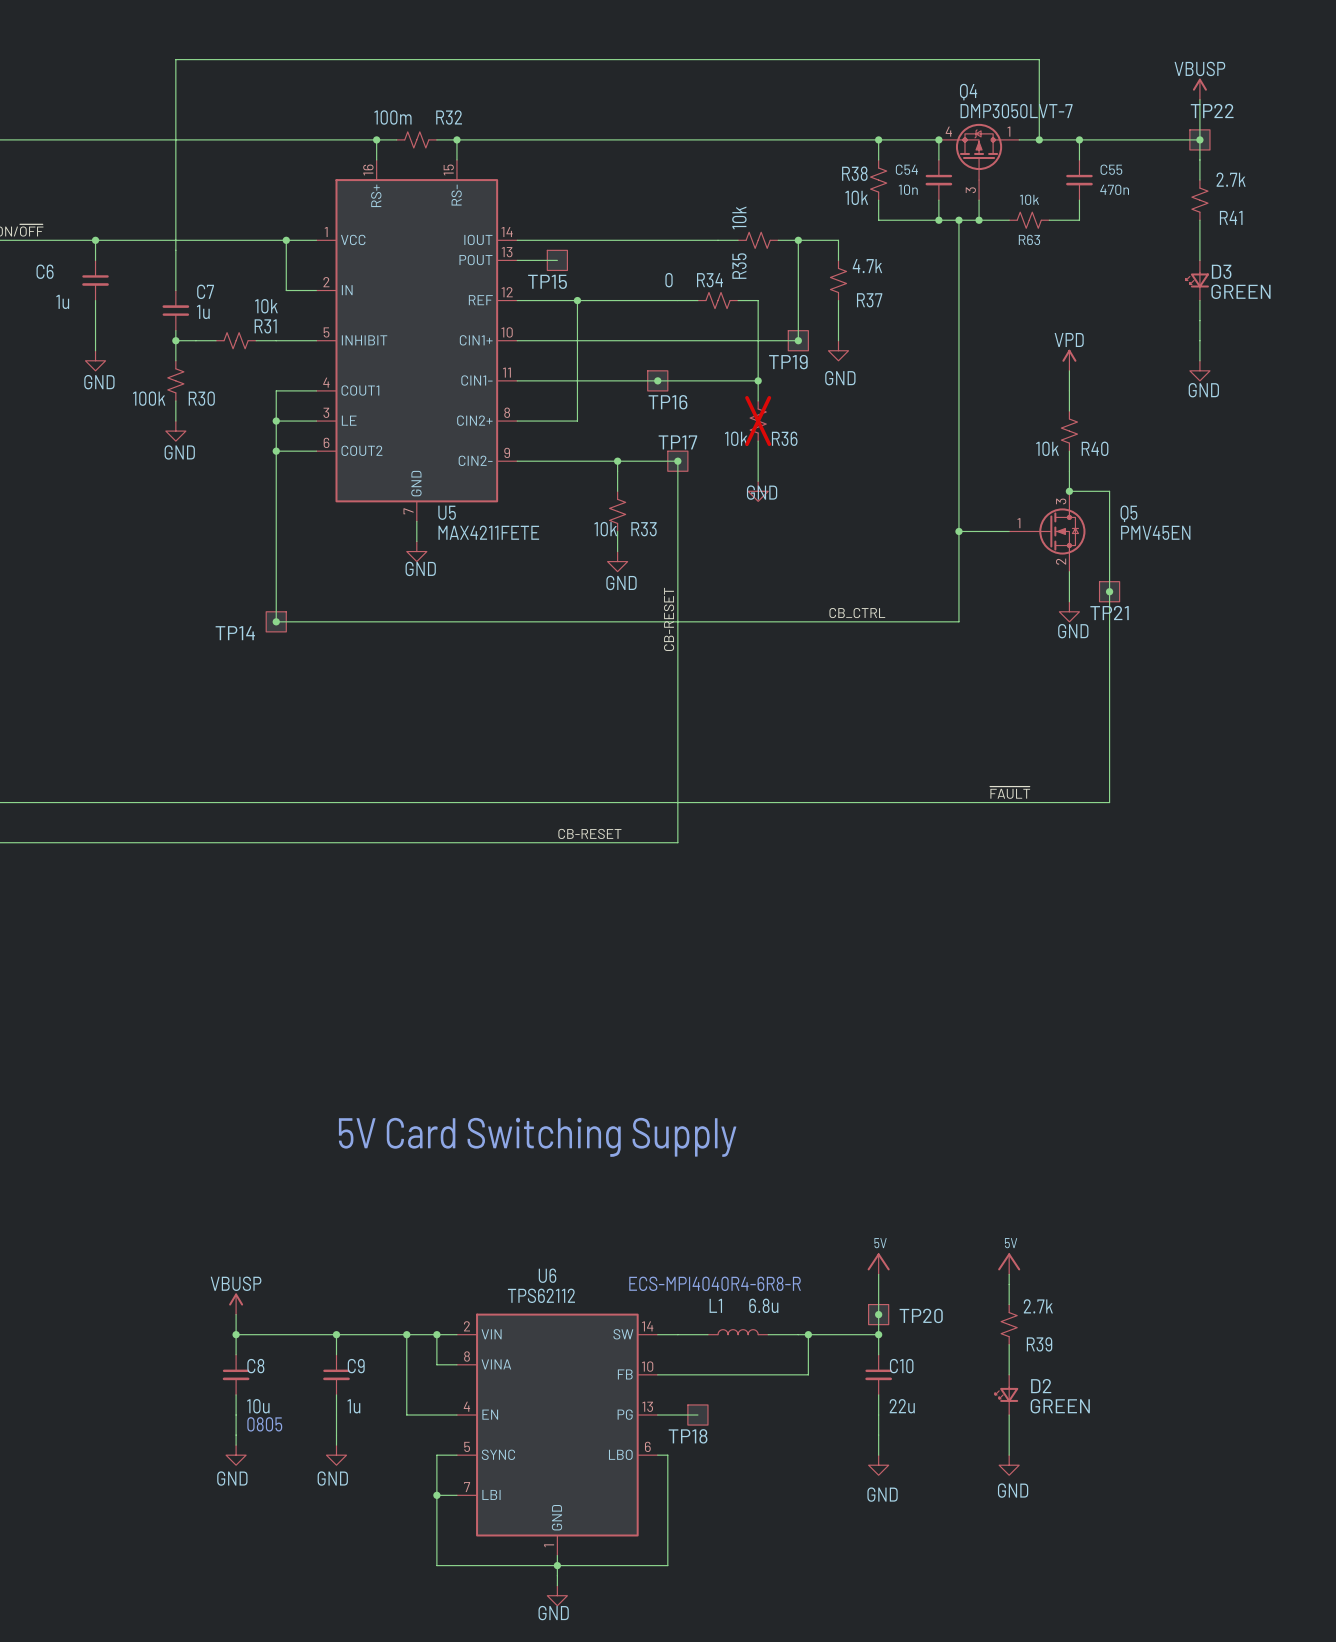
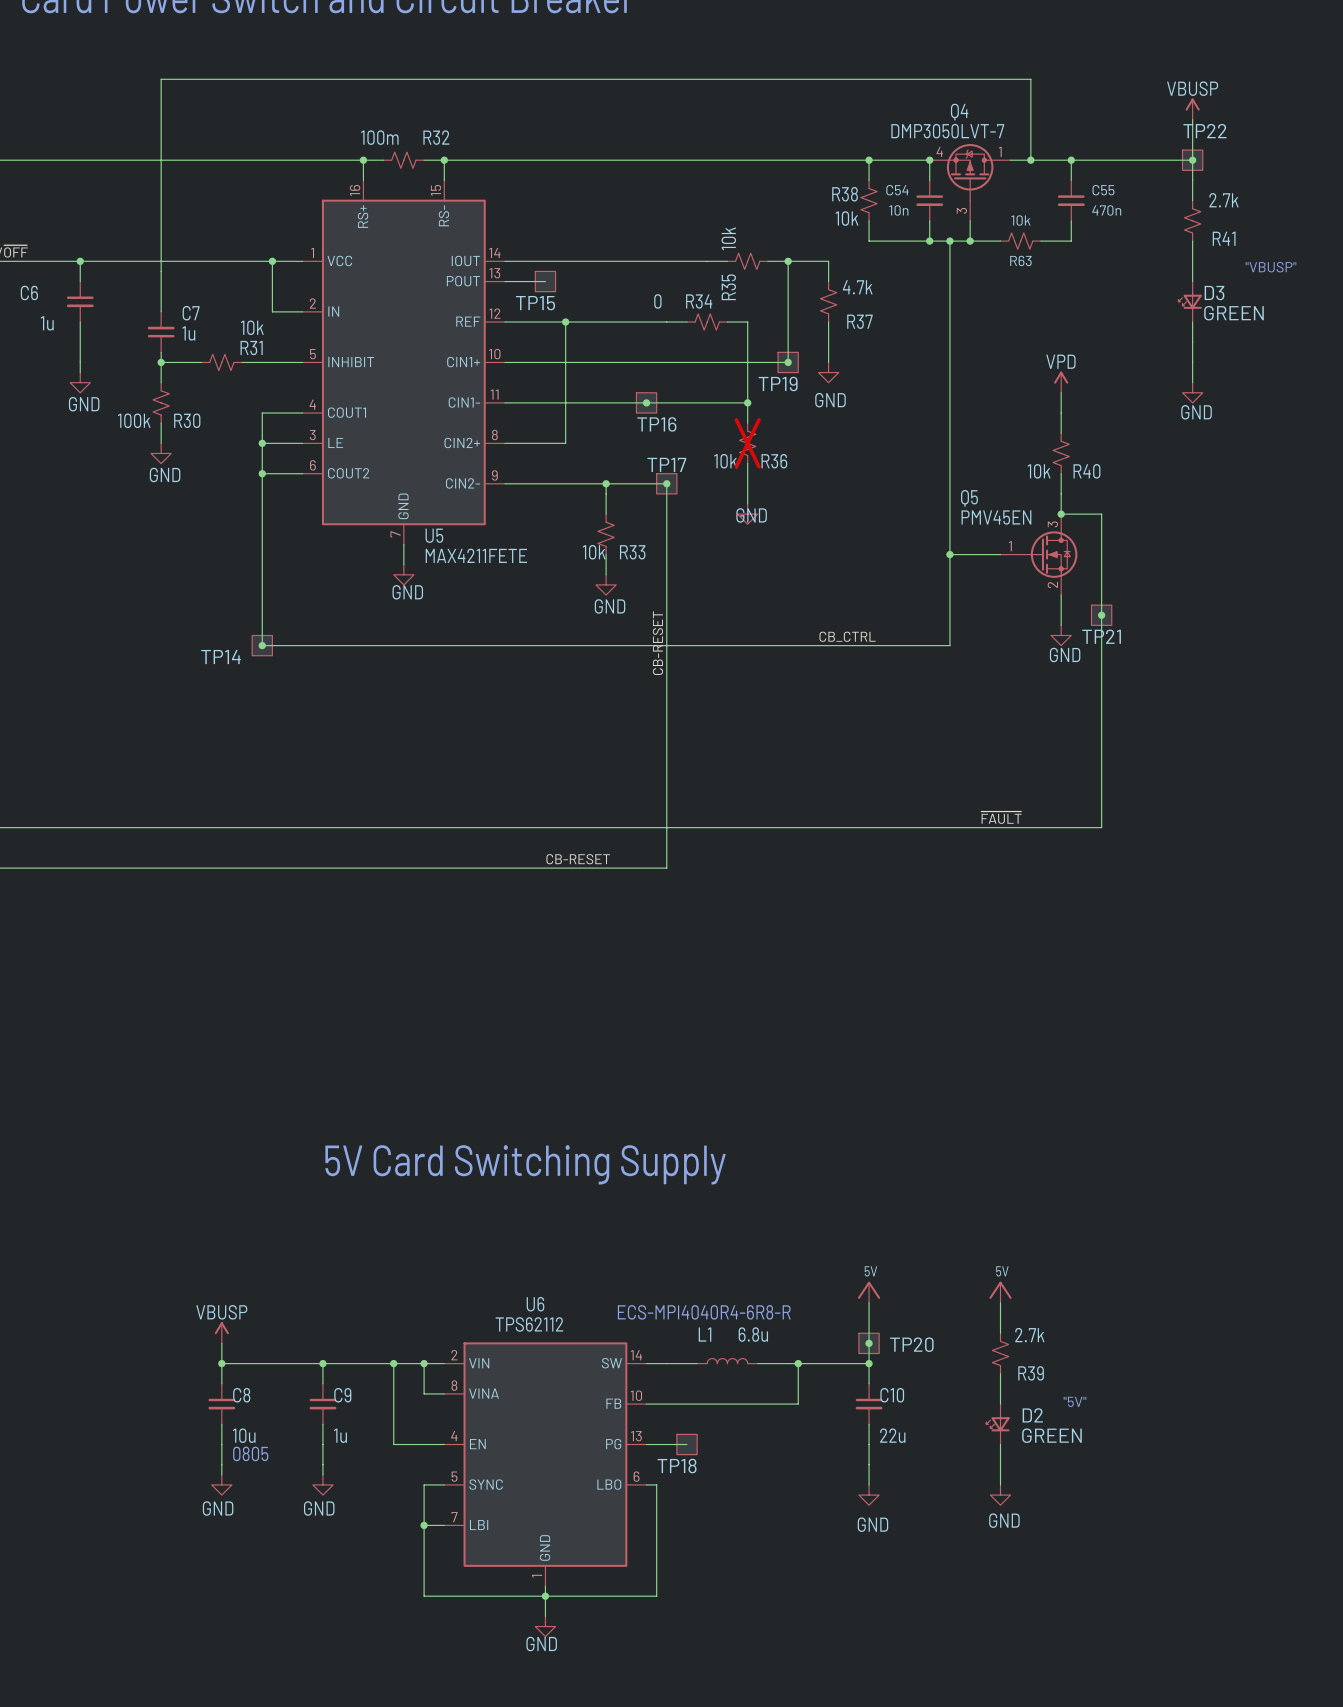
Q4 value position: DMP3050LVT-7 (1016, 111) -> DMP3050LVT-7 (947, 131)
text: none -> "VBUSP" (1270, 267)
Q5 name position: Q5 (1128, 513) -> Q5 (969, 498)
Q5 value position: PMV45EN (1155, 532) -> PMV45EN (996, 517)
text: none -> "5V" (1074, 1401)

